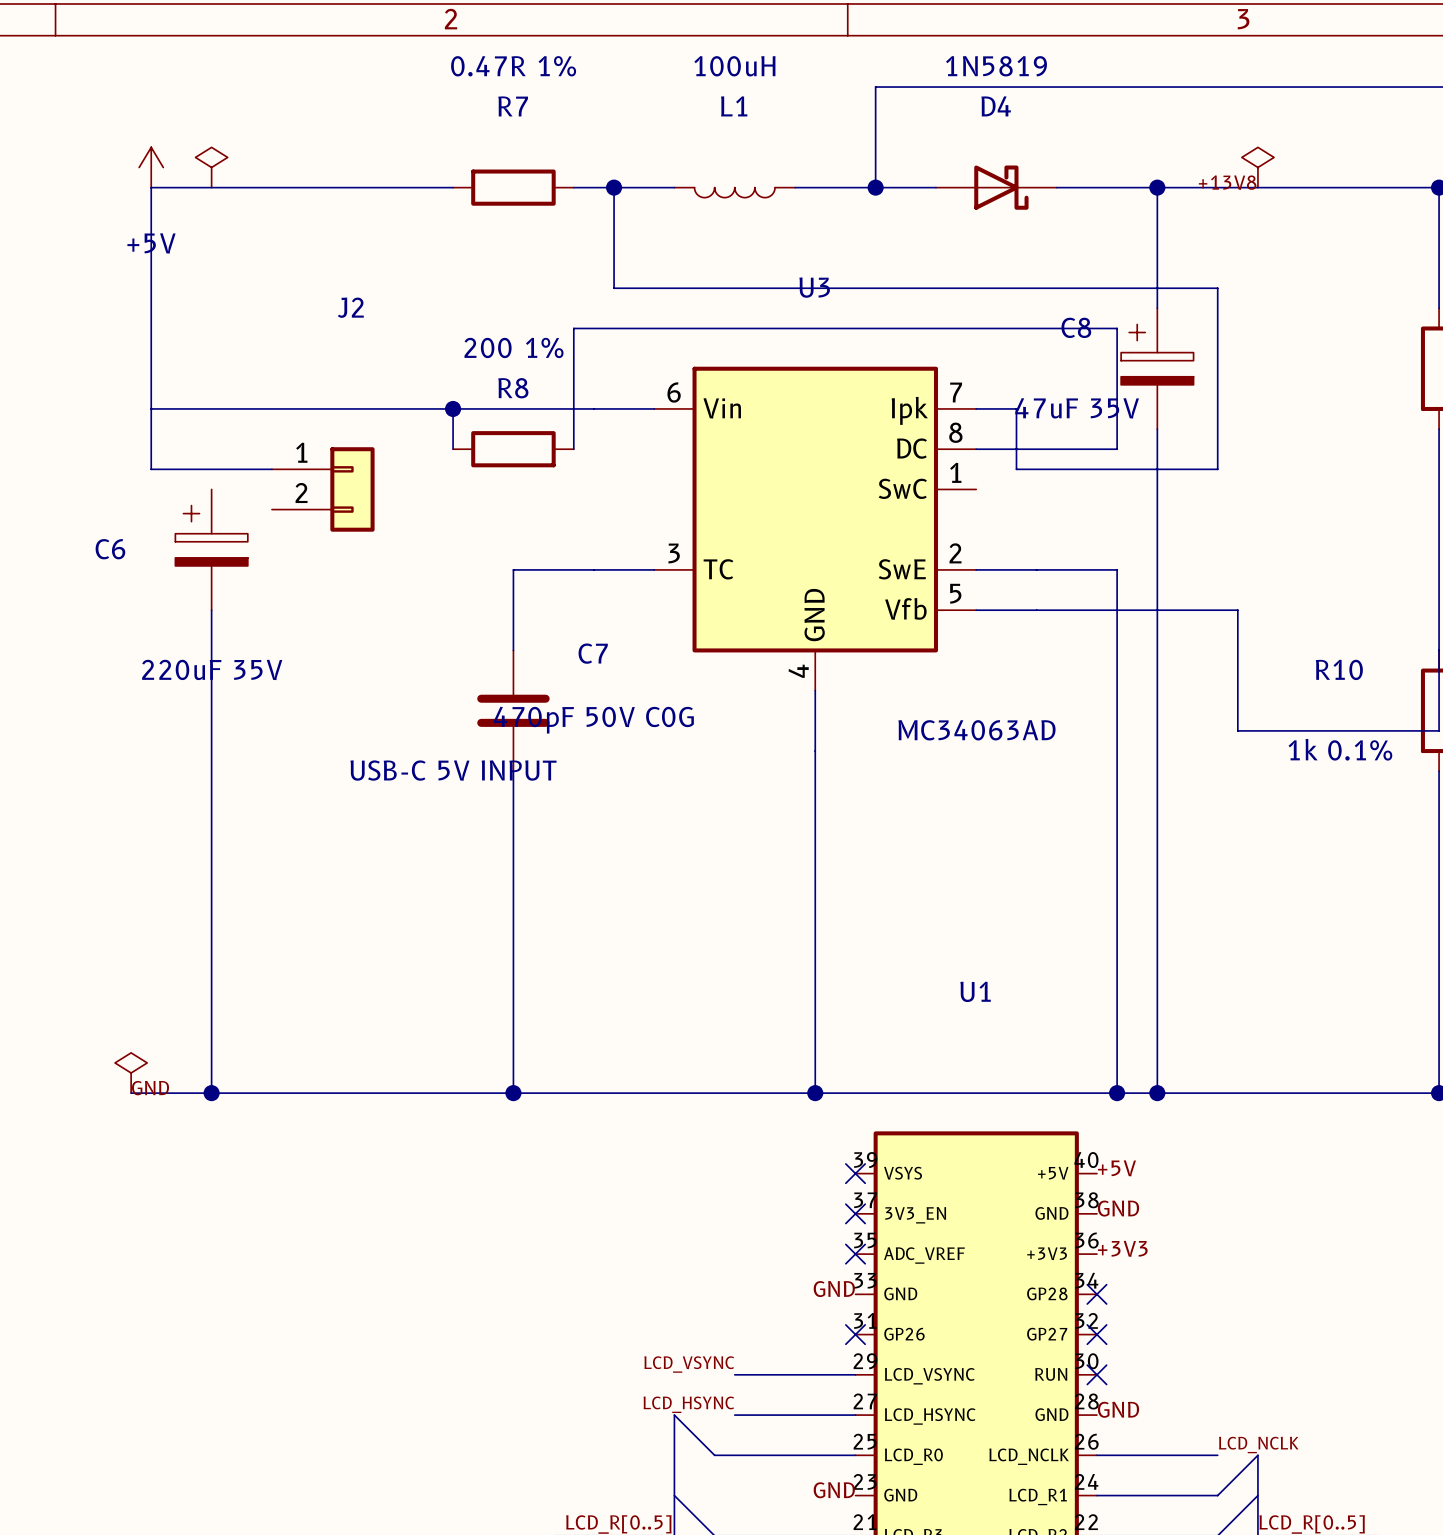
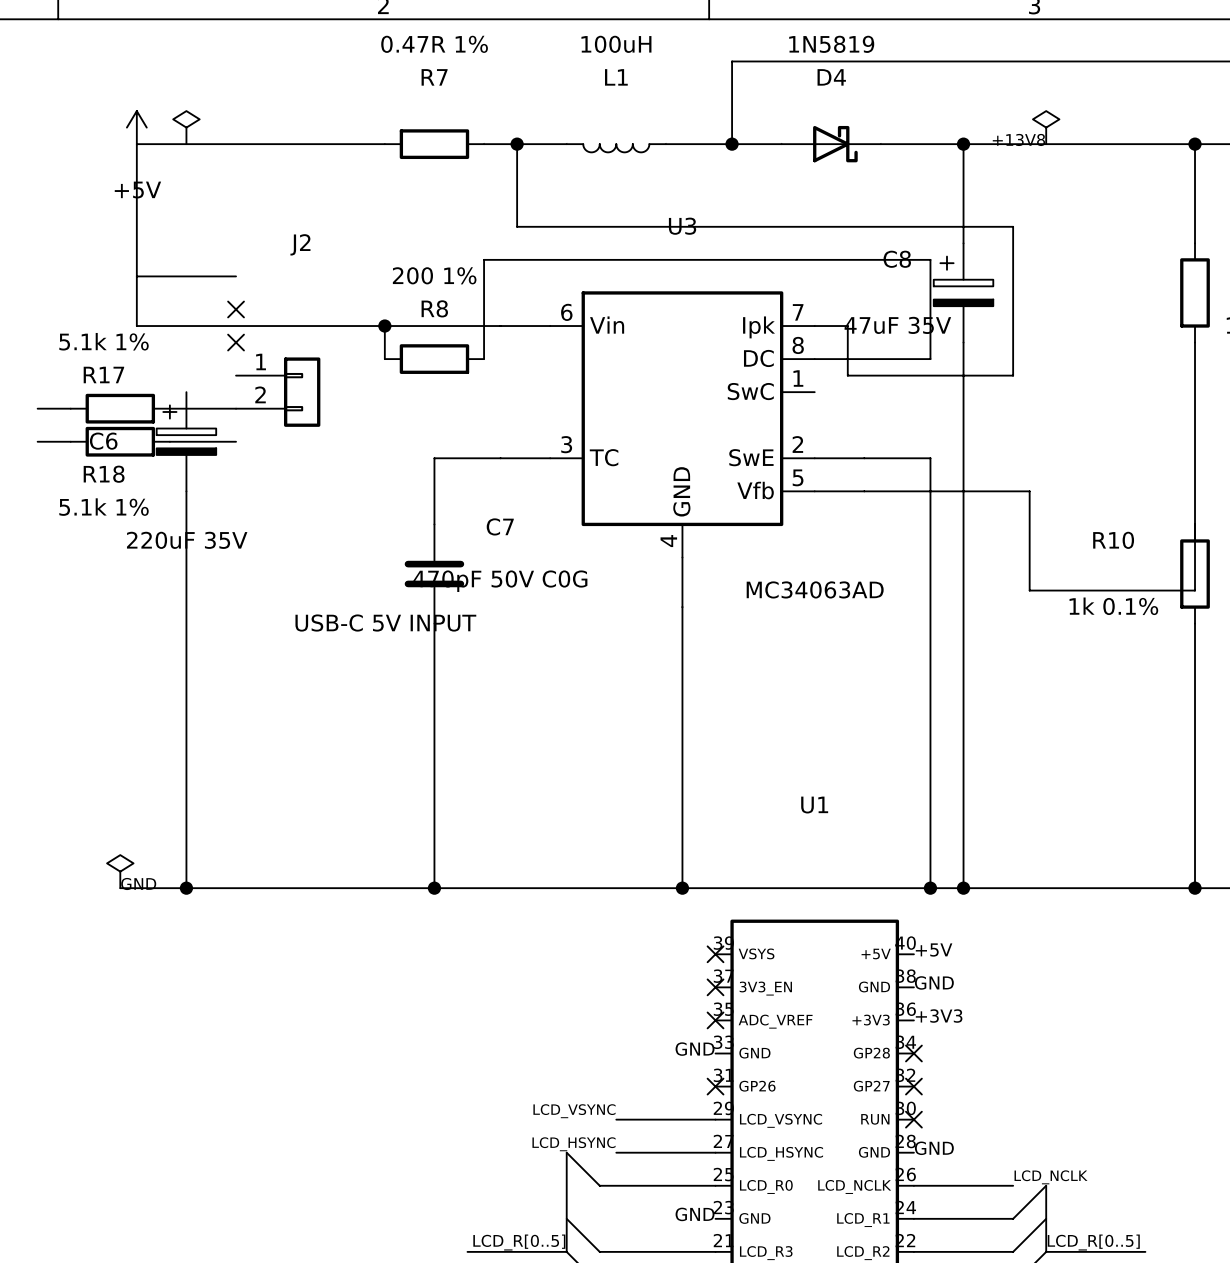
wire: none -> (136, 276) (236, 276)
no-connect mark: none -> (236, 309)
wire: (151, 408) (151, 469) (271, 469) -> none
no-connect mark: none -> (236, 342)
wire: none -> (37, 408) (70, 408)
R17: none -> 5.1k 1% (120, 408)
wire: none -> (169, 408) (236, 408)
wire: none -> (37, 441) (70, 441)
R18: none -> 5.1k 1% (120, 441)
wire: none -> (169, 441) (236, 441)

